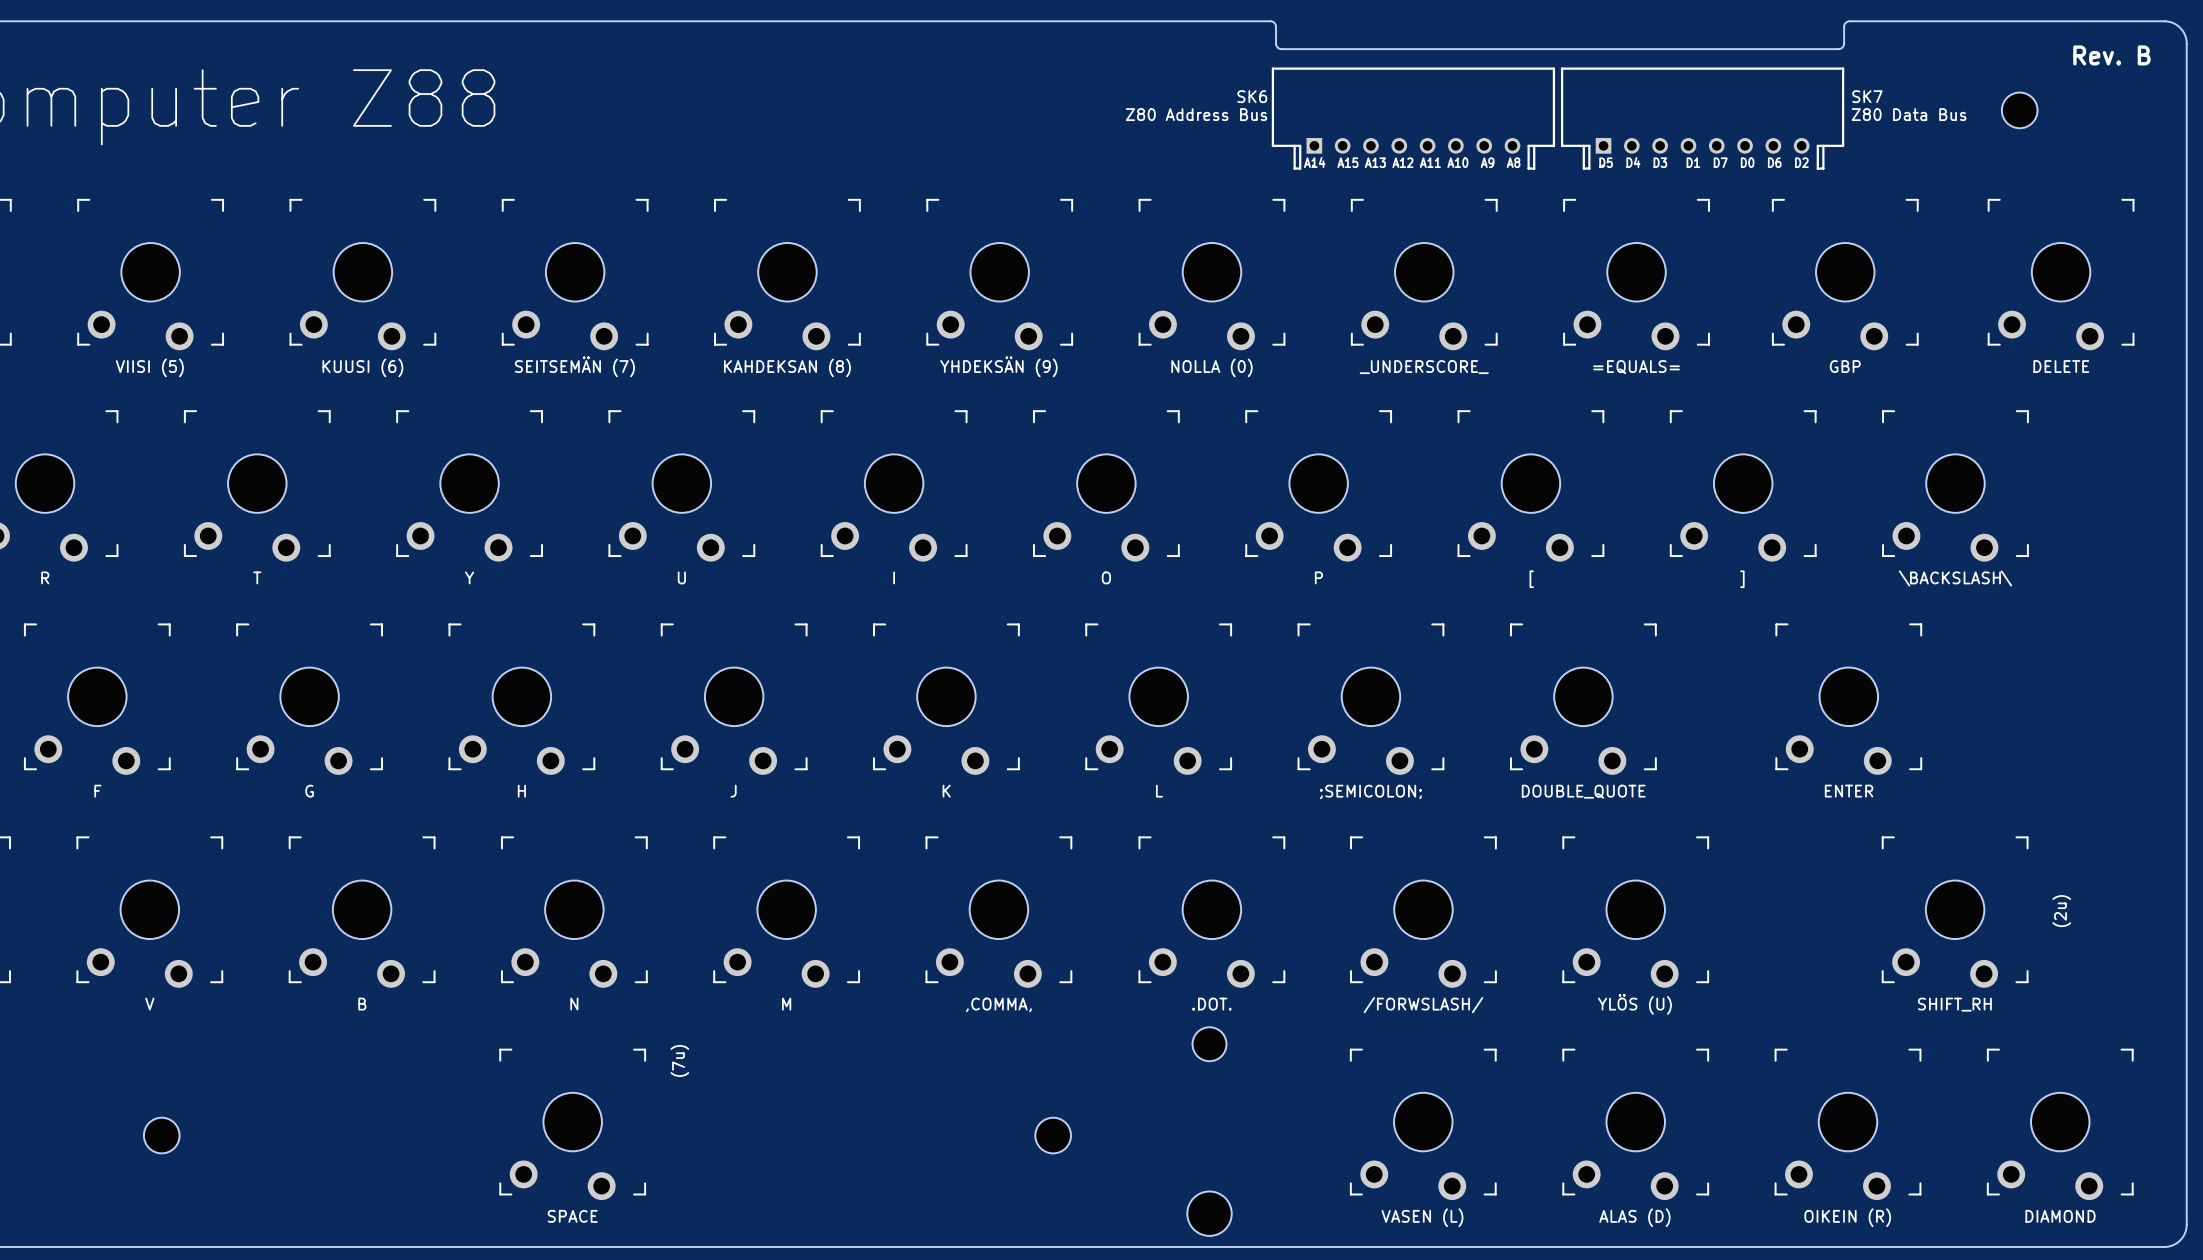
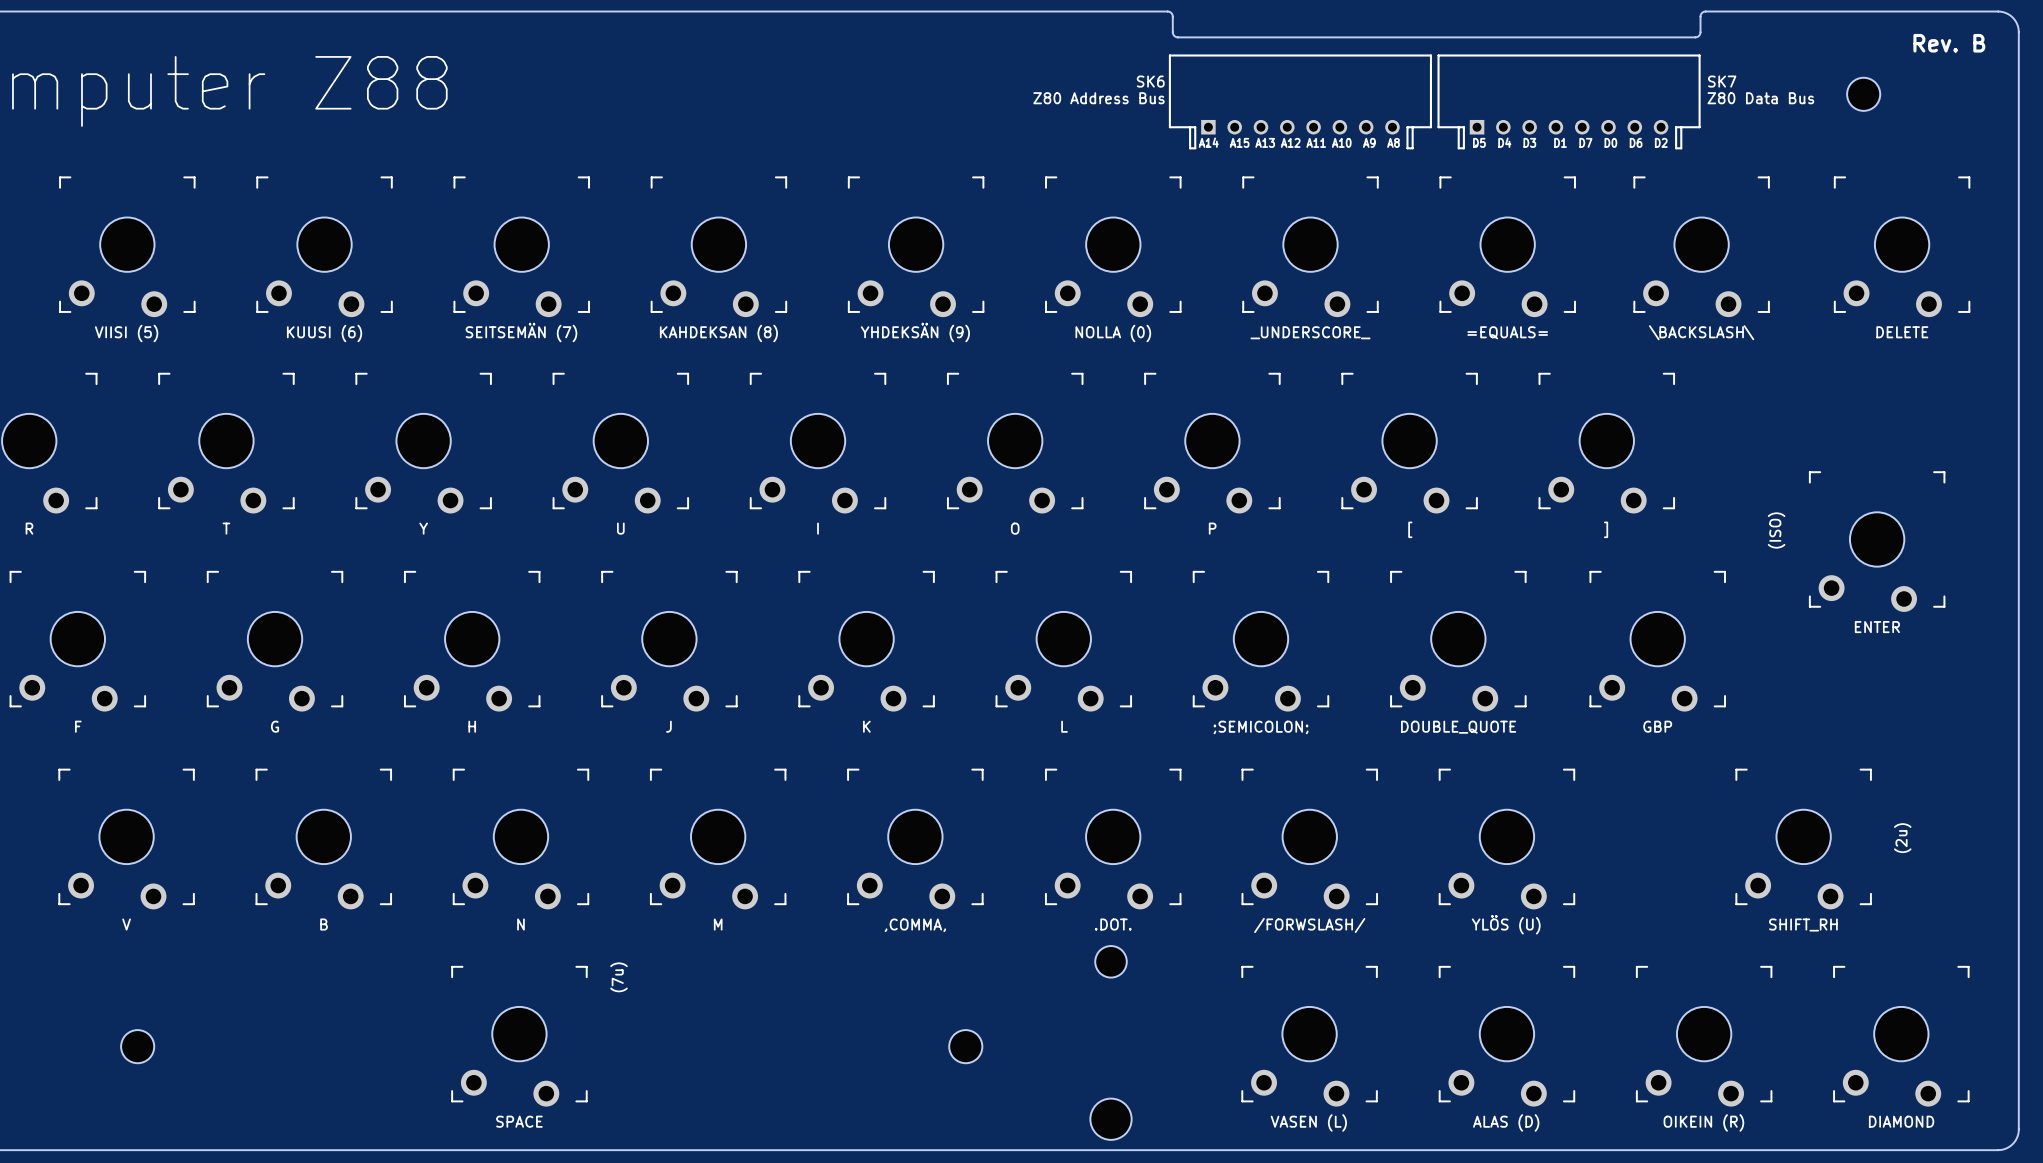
part value: GBP (1845, 366) -> \BACKSLASH\ (1701, 332)
part: \BACKSLASH\ (1955, 486) -> none
text: none -> (ISO) (1776, 530)
part: none -> GBP (1657, 641)
part position: (1848, 699) -> (1877, 541)

